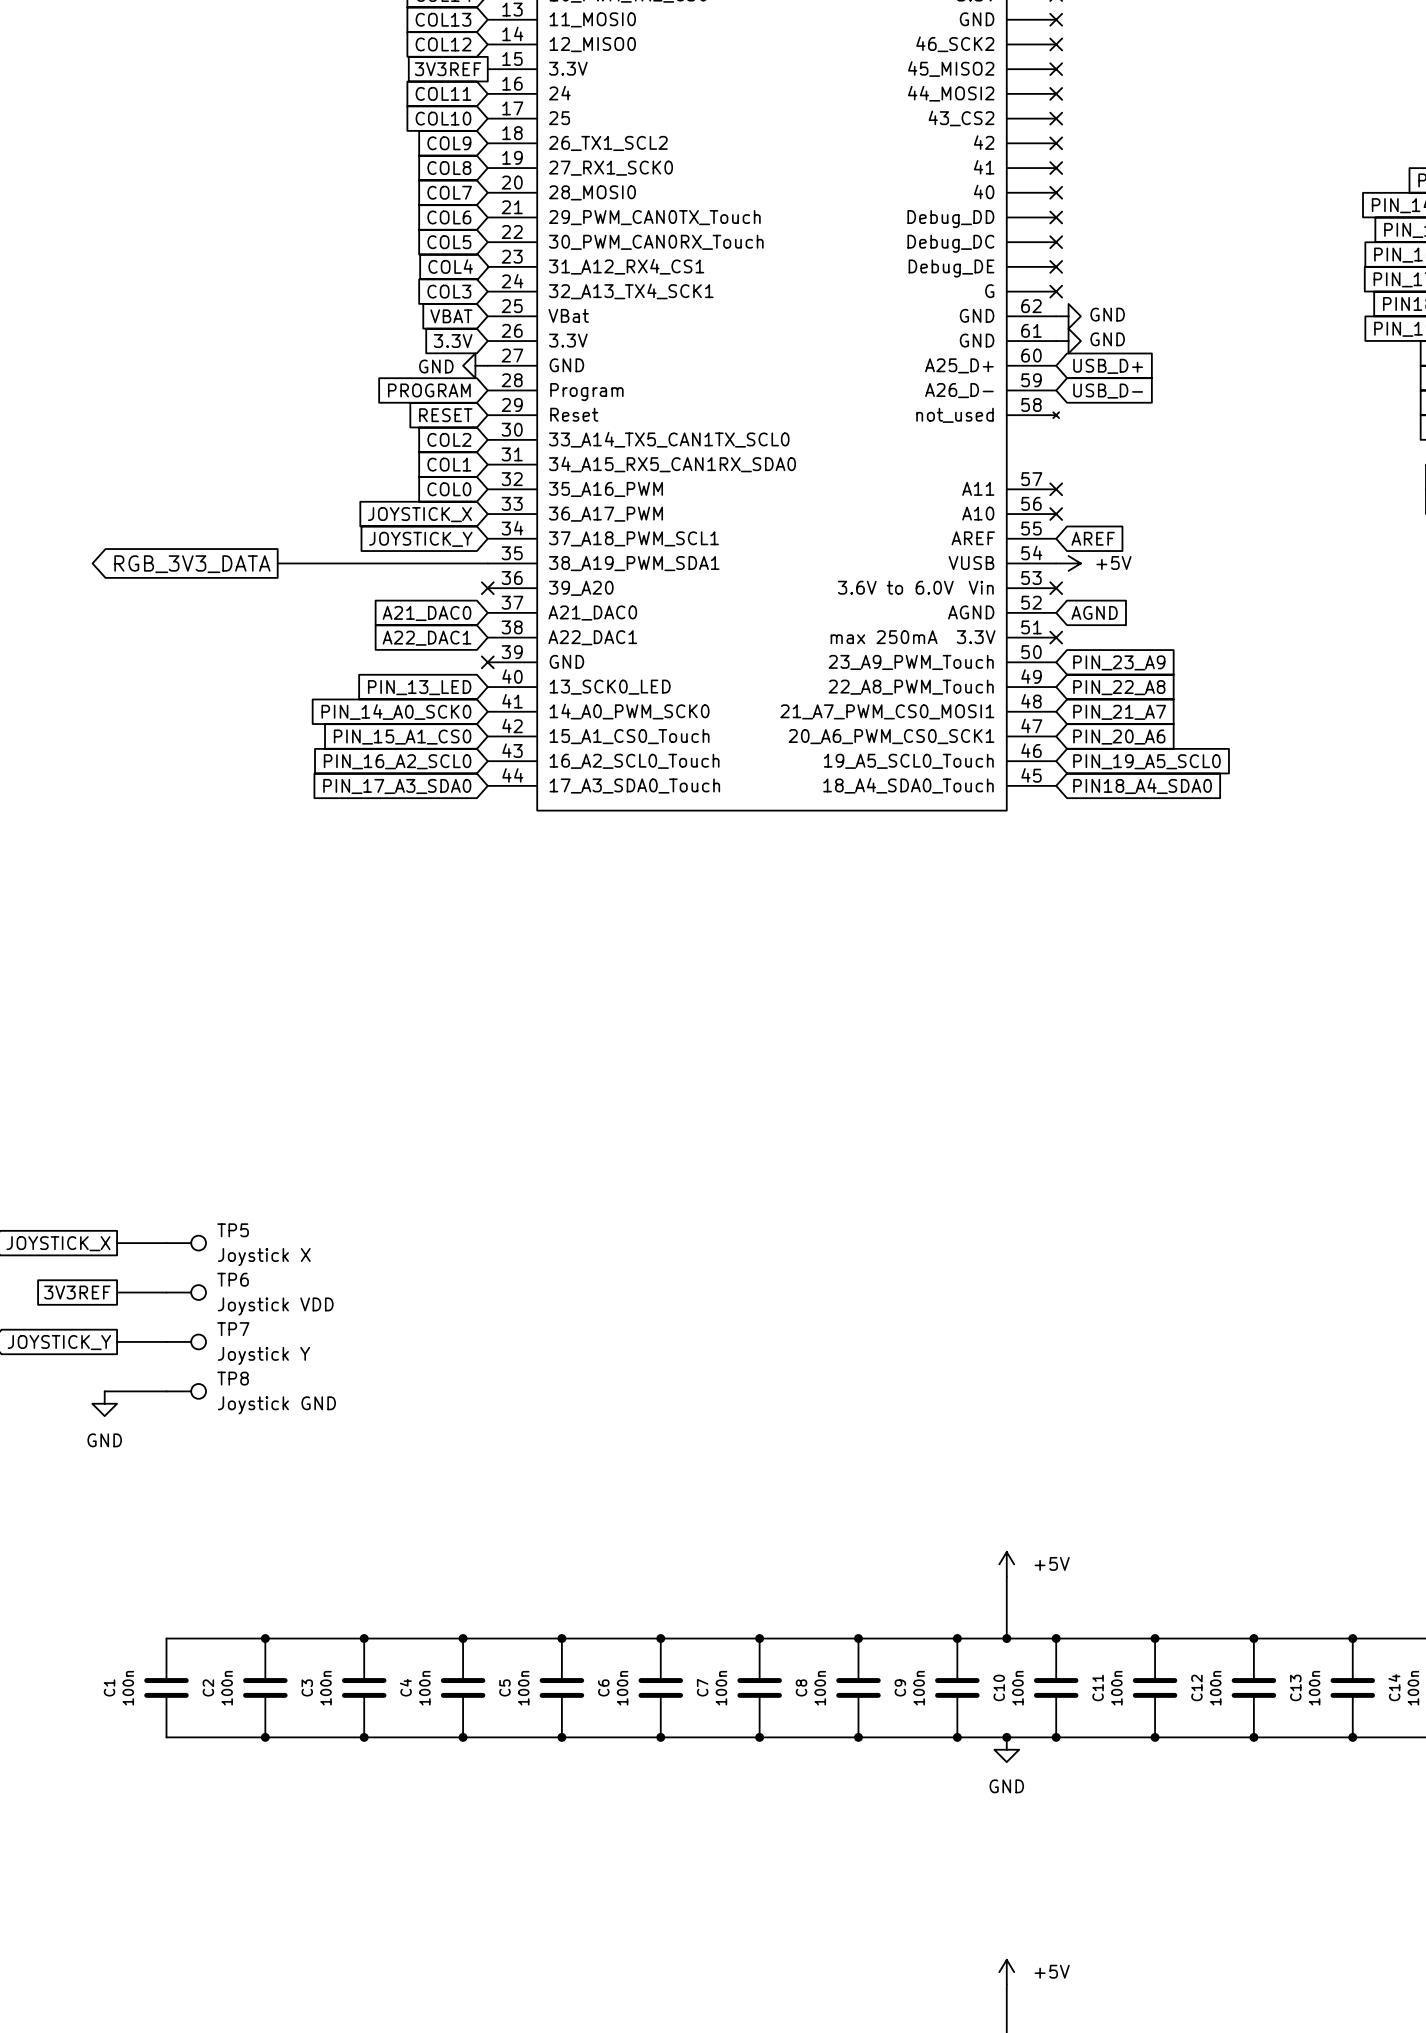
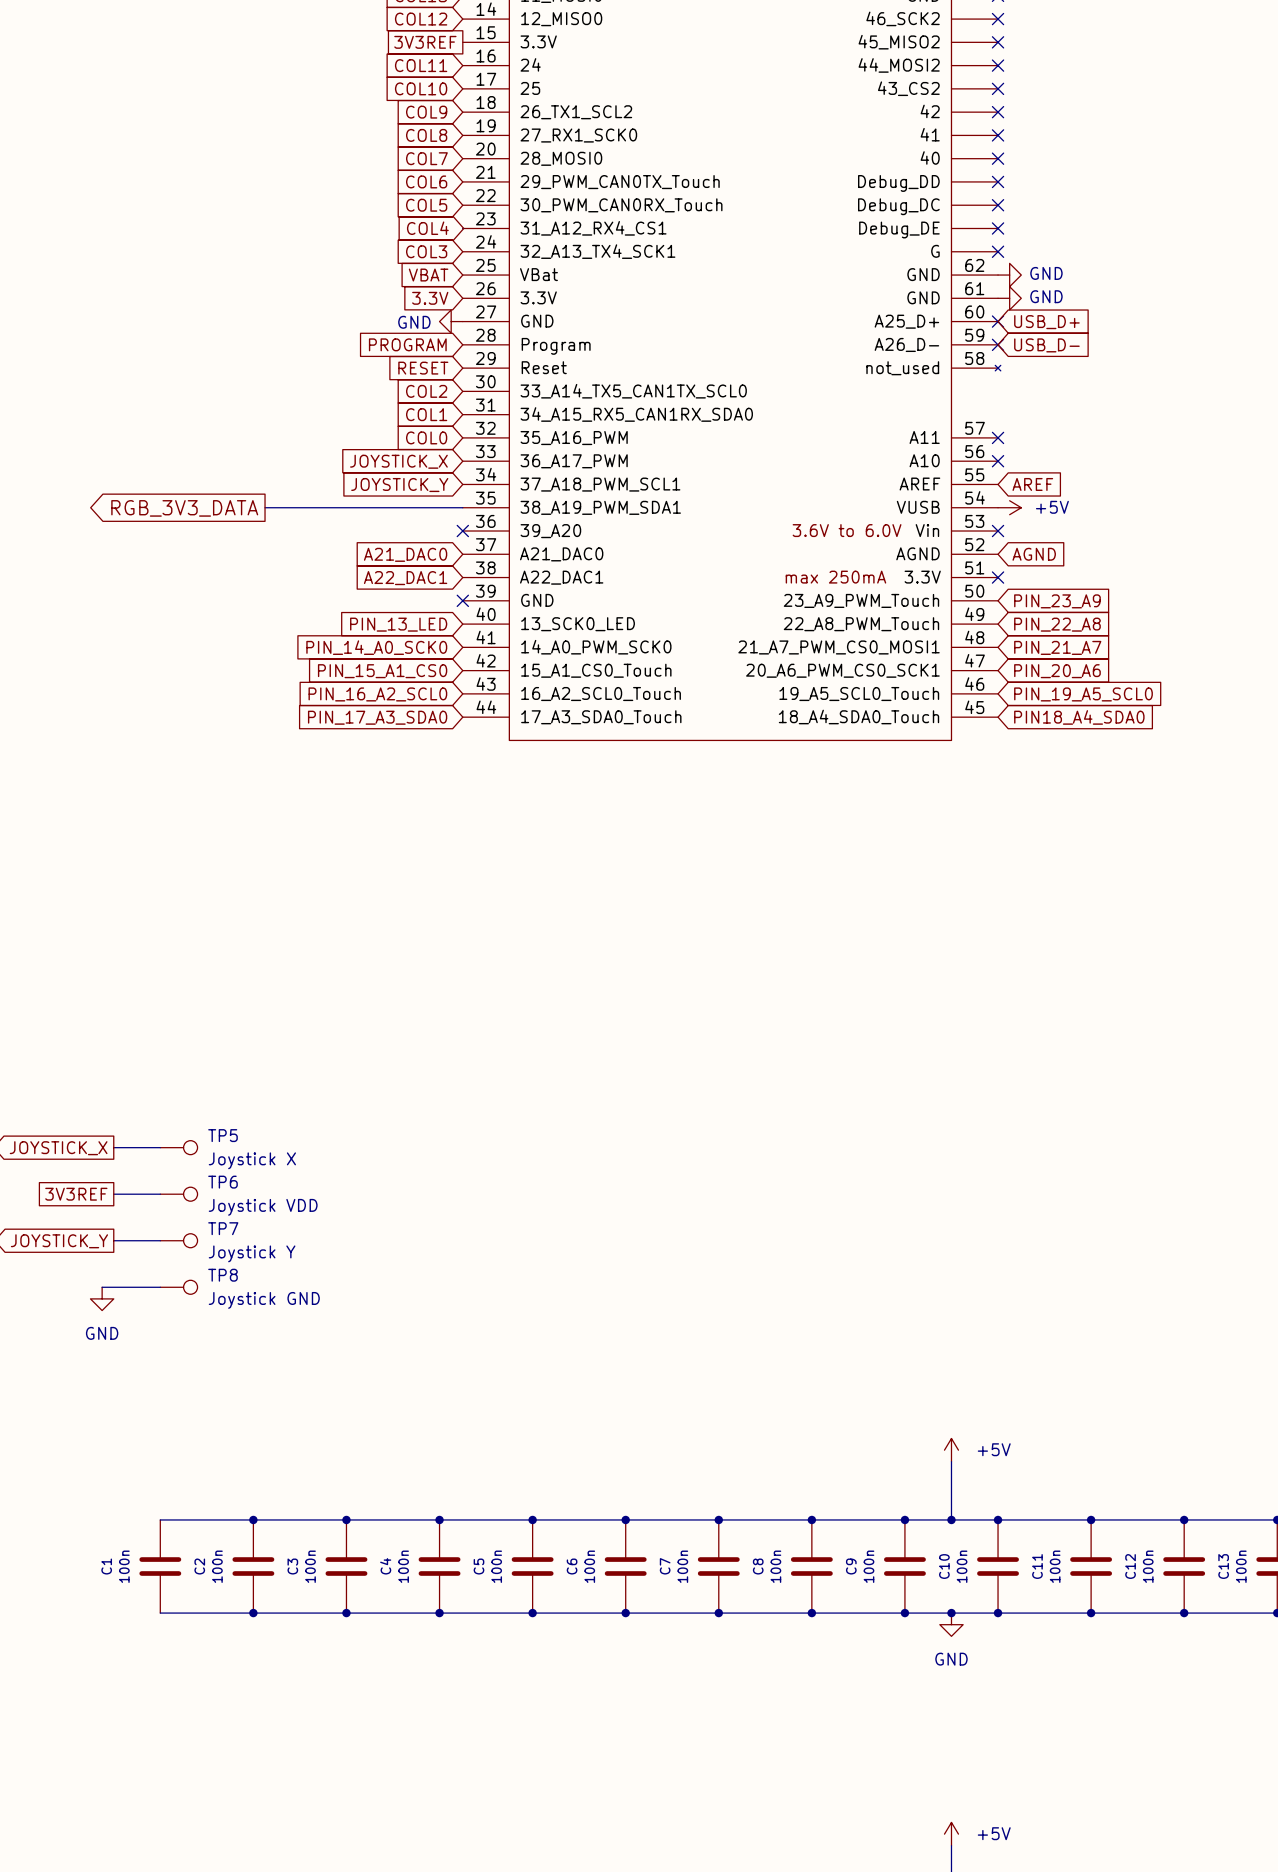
no-connect mark: none -> (998, 321)
no-connect mark: none -> (998, 344)

